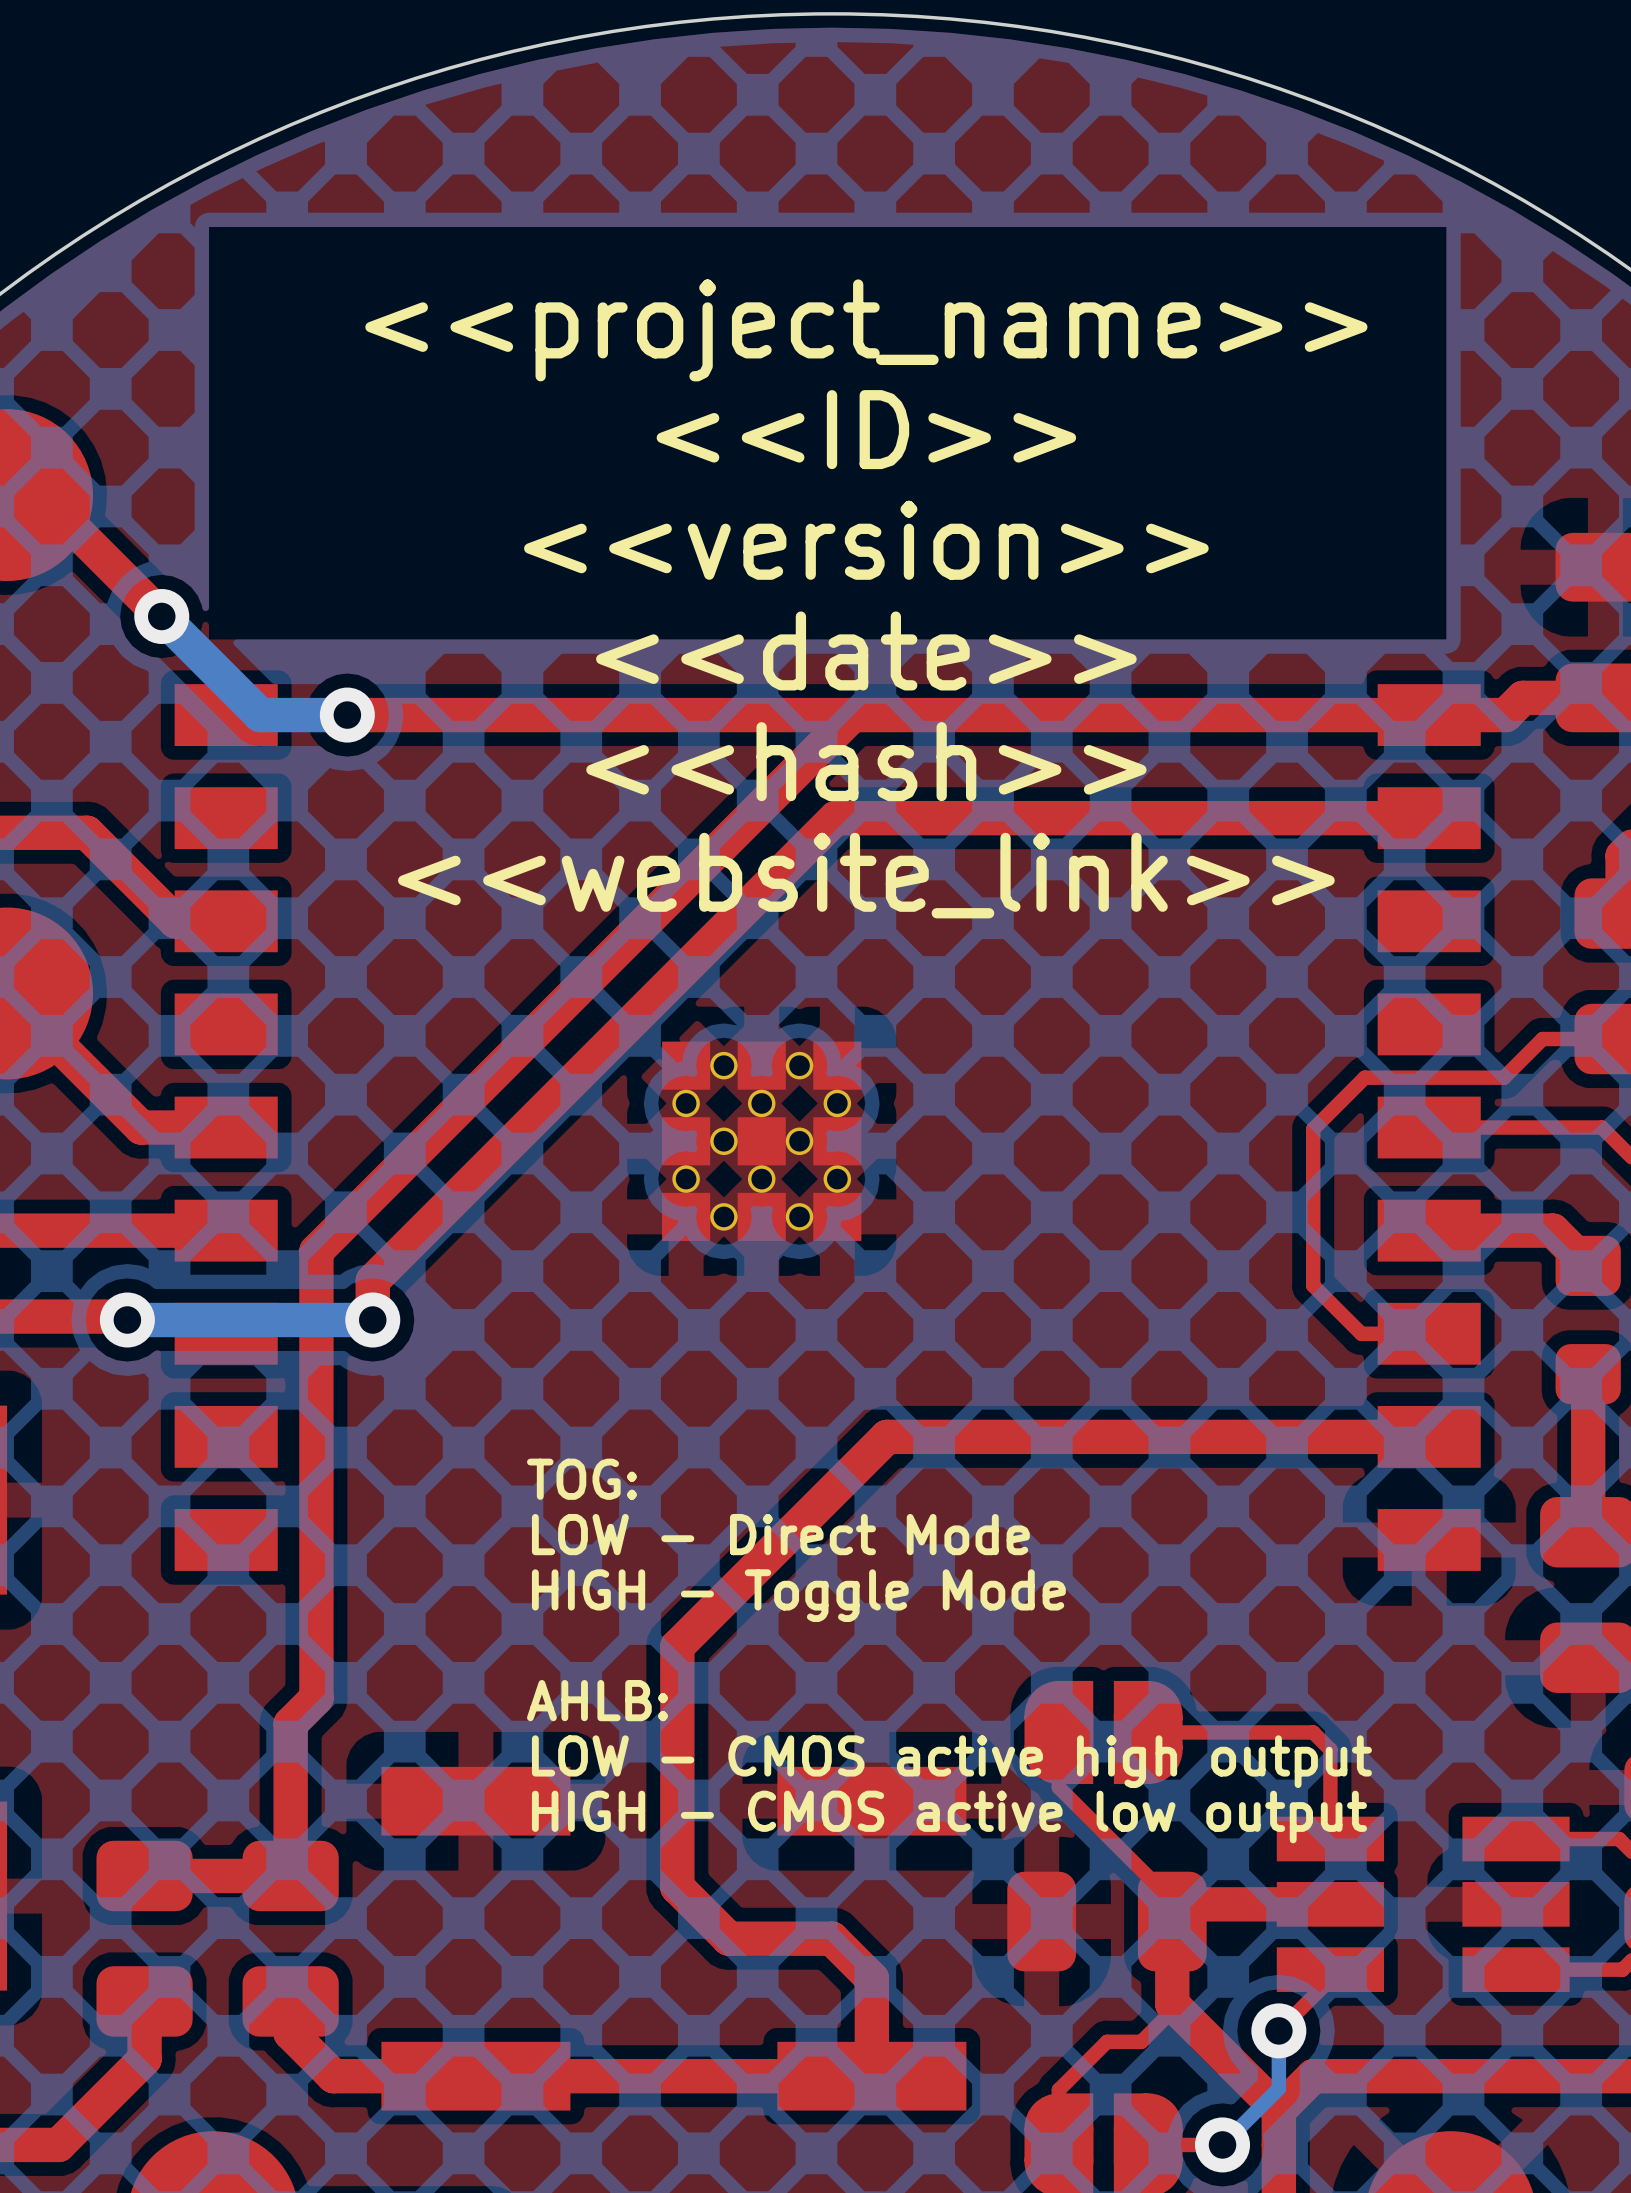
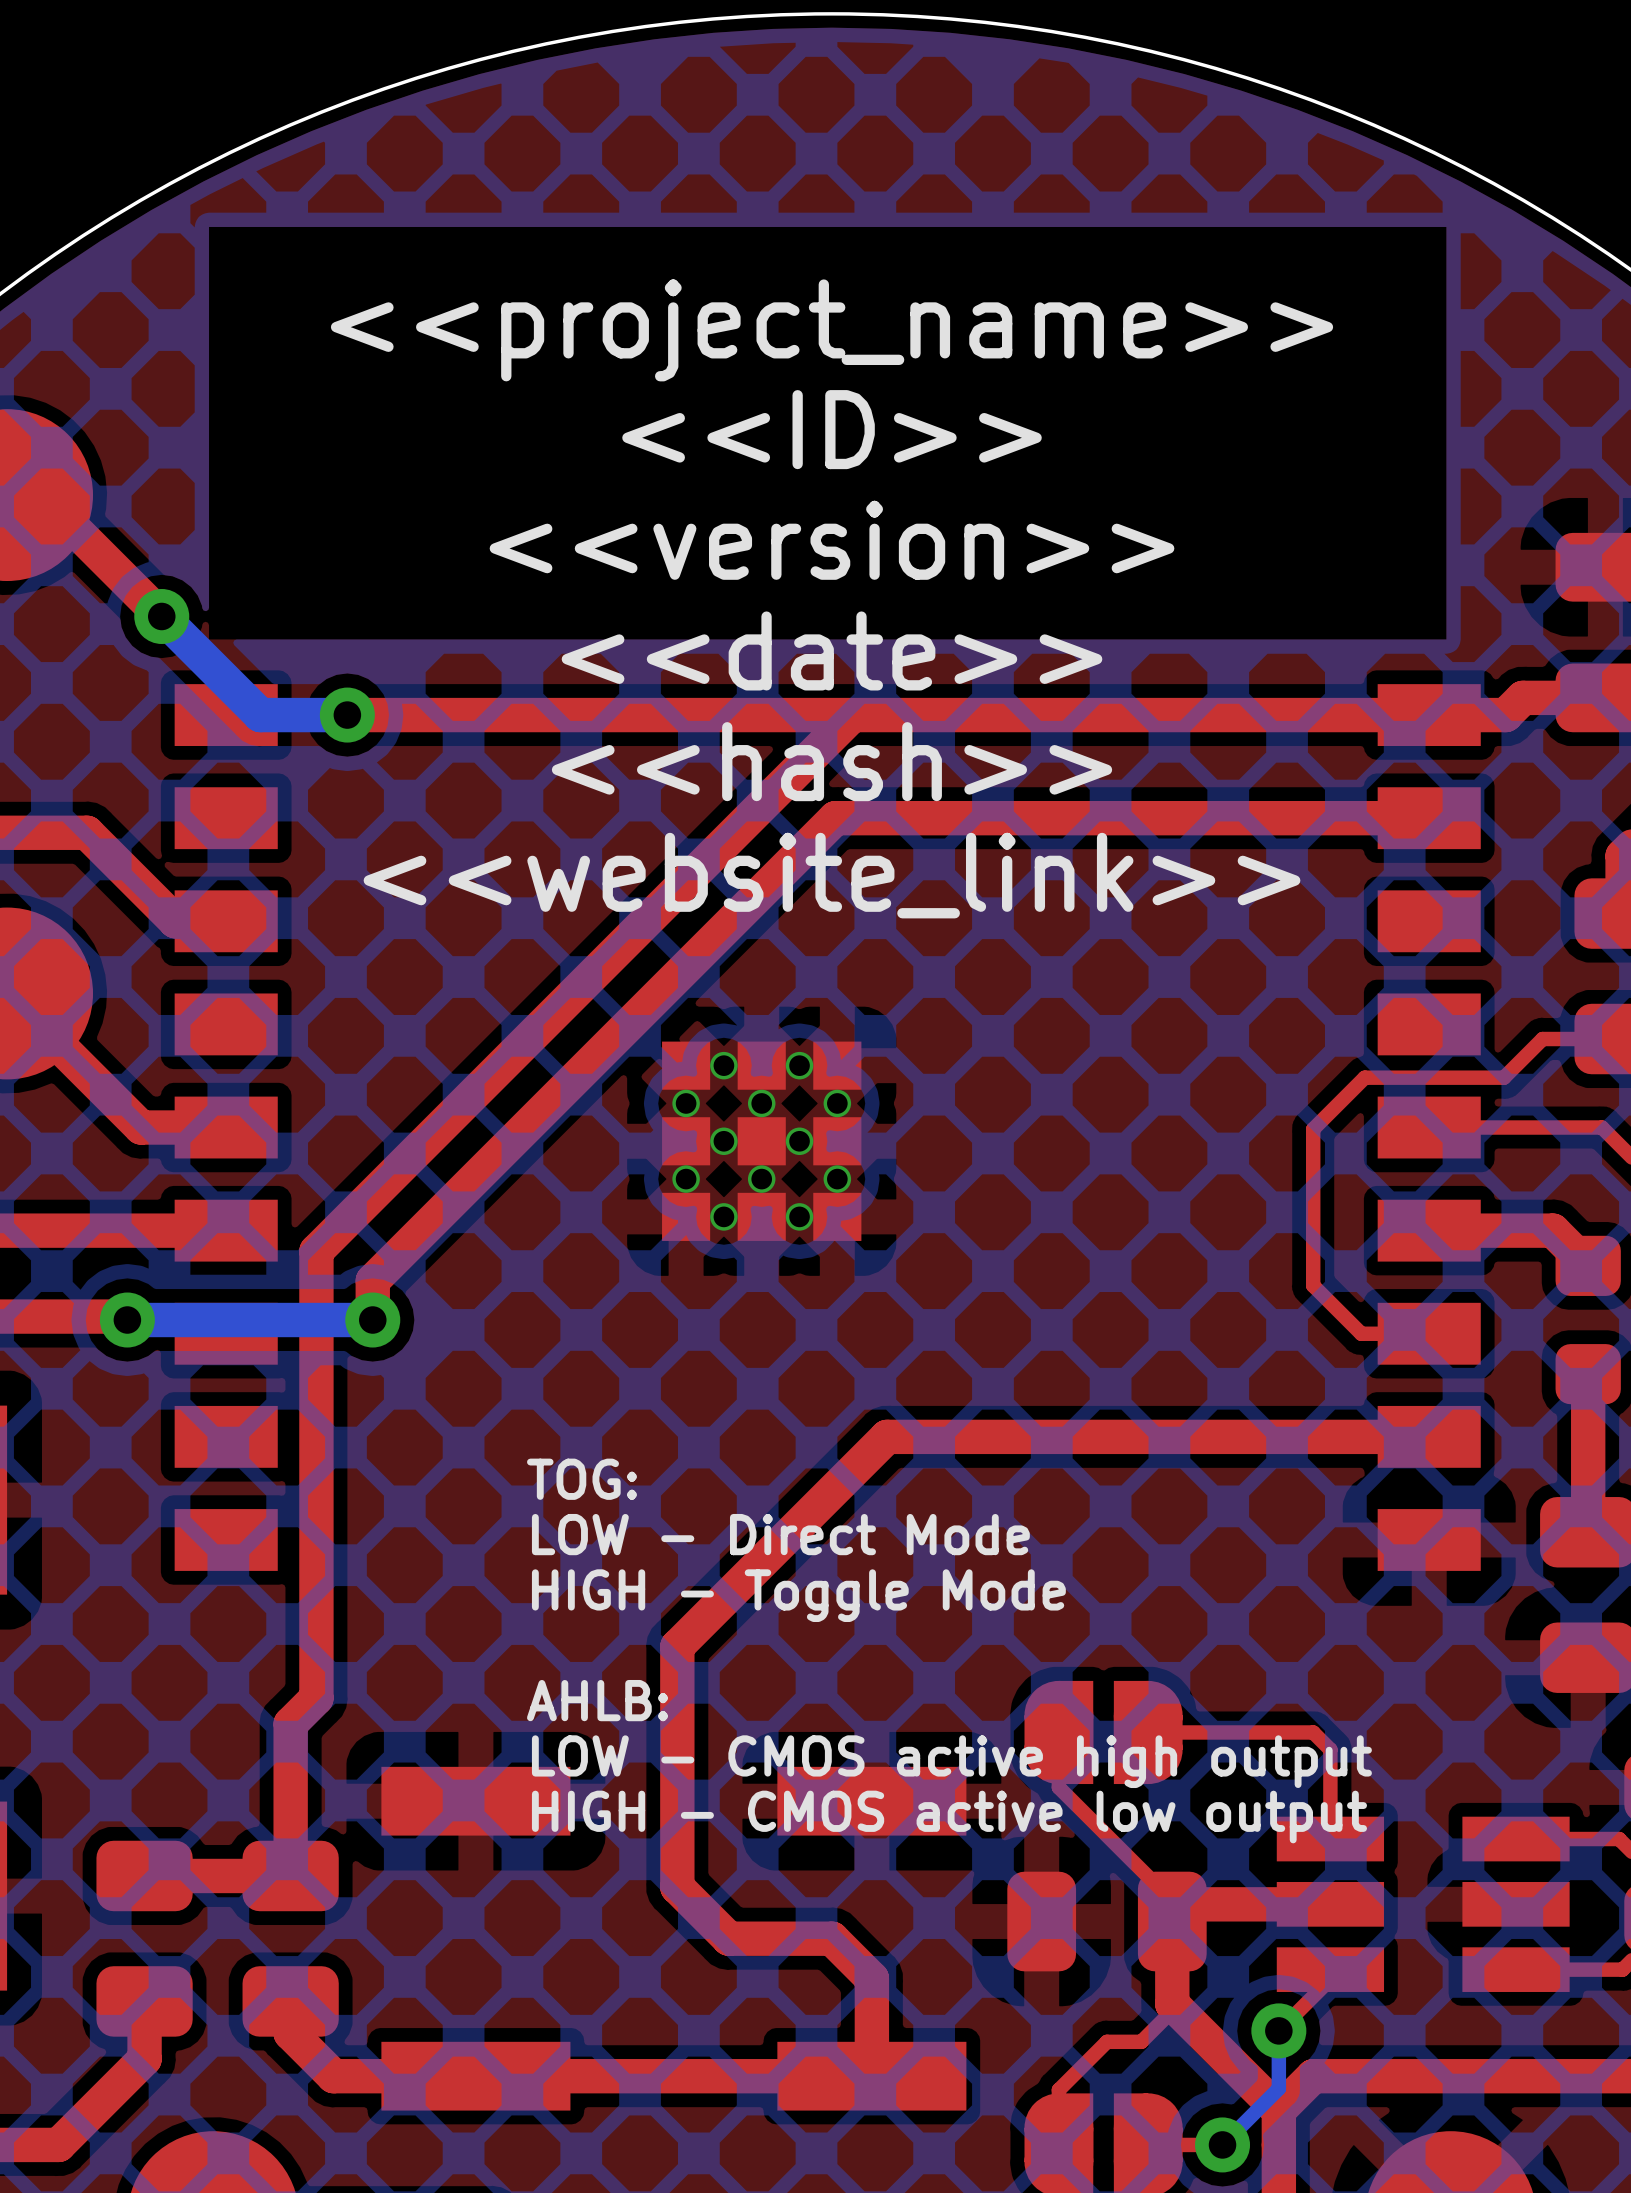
text position: <<project_name>> (866, 330) -> <<project_name>> (832, 330)
text position: <<ID>> (866, 429) -> <<ID>> (832, 429)
text position: <<version>> (866, 540) -> <<version>> (832, 540)
text position: <<date>> (866, 650) -> <<date>> (832, 650)
text position: <<hash>> (866, 761) -> <<hash>> (832, 761)
text position: <<website_link>> (866, 875) -> <<website_link>> (832, 875)

